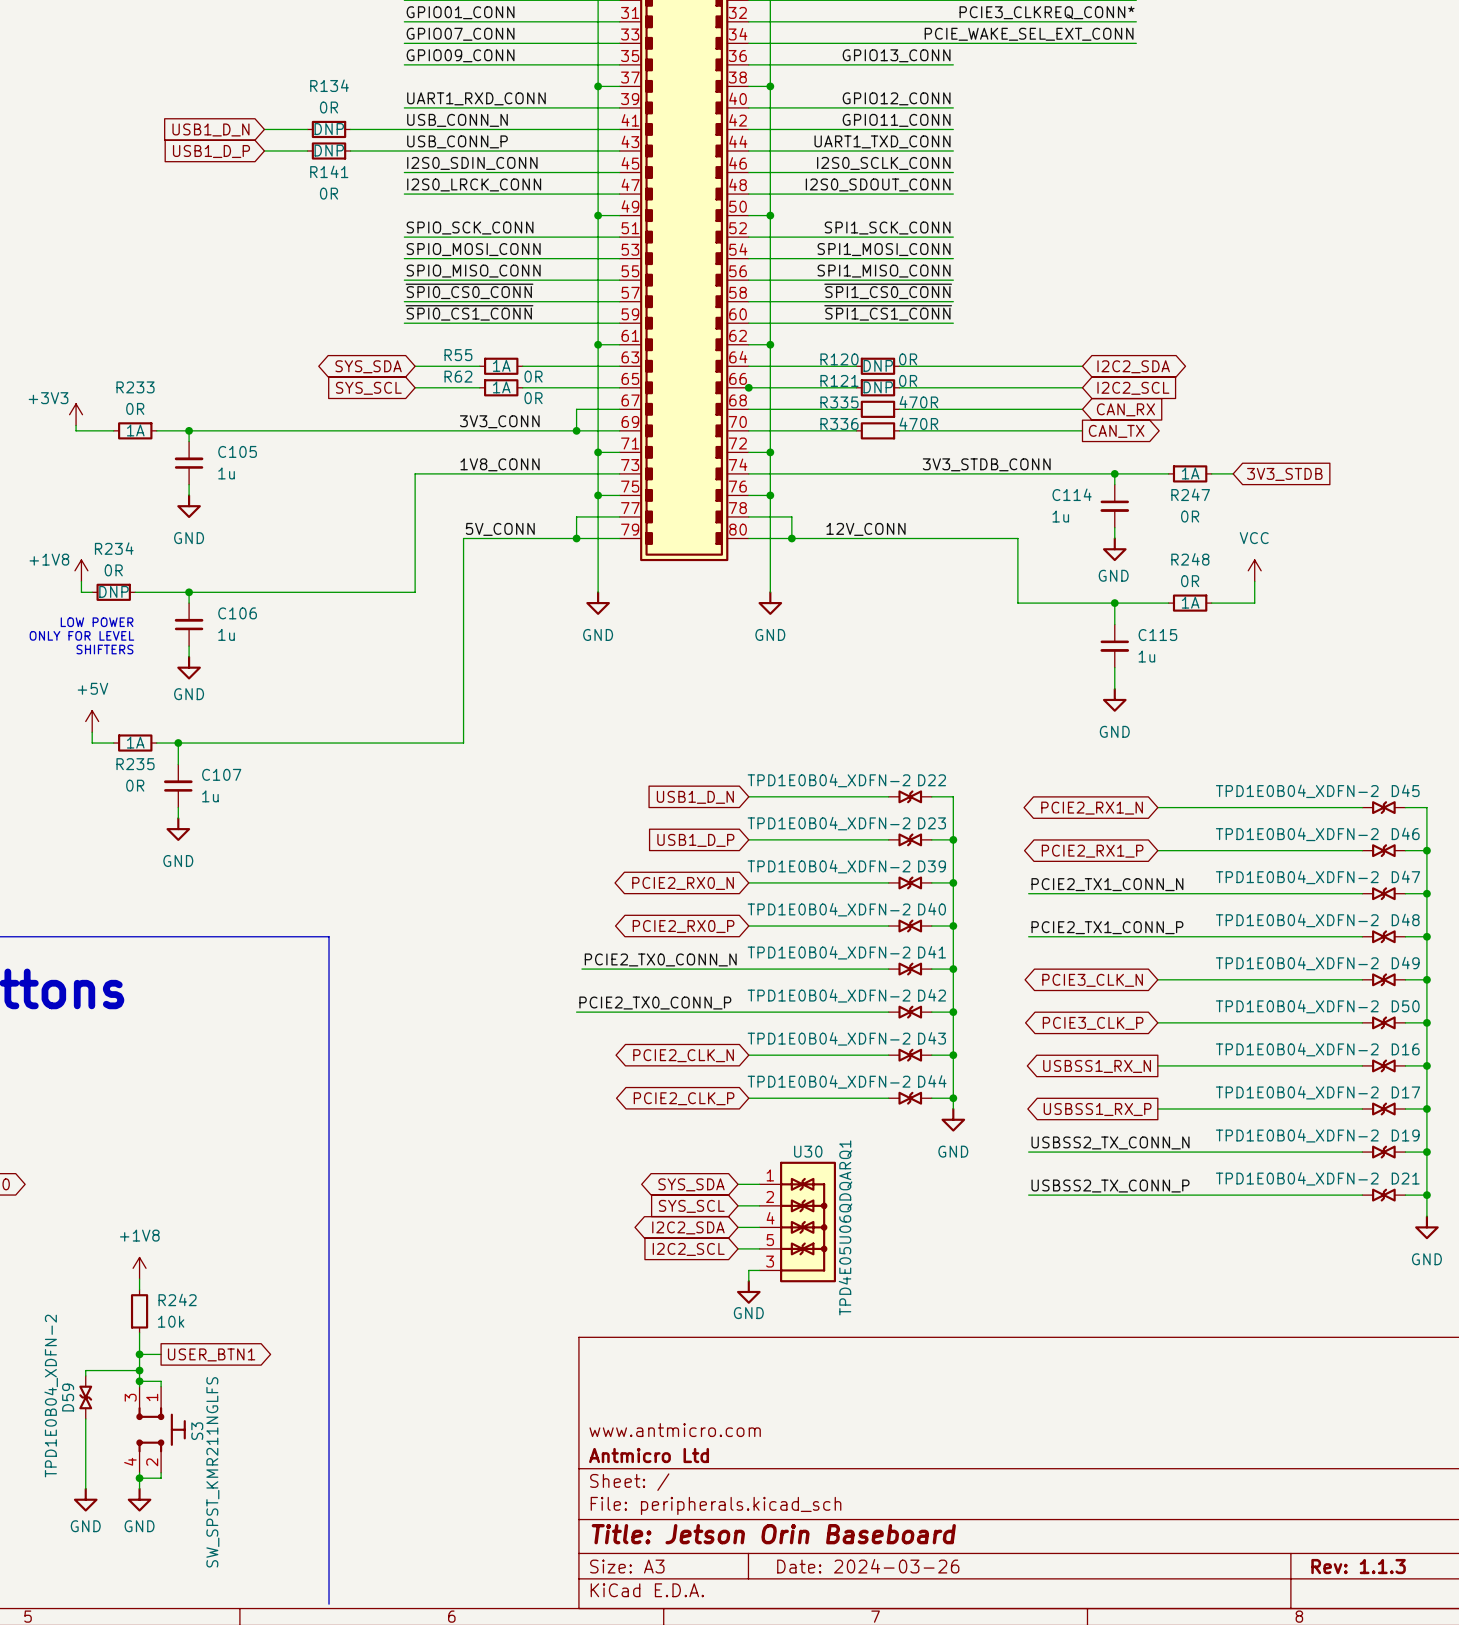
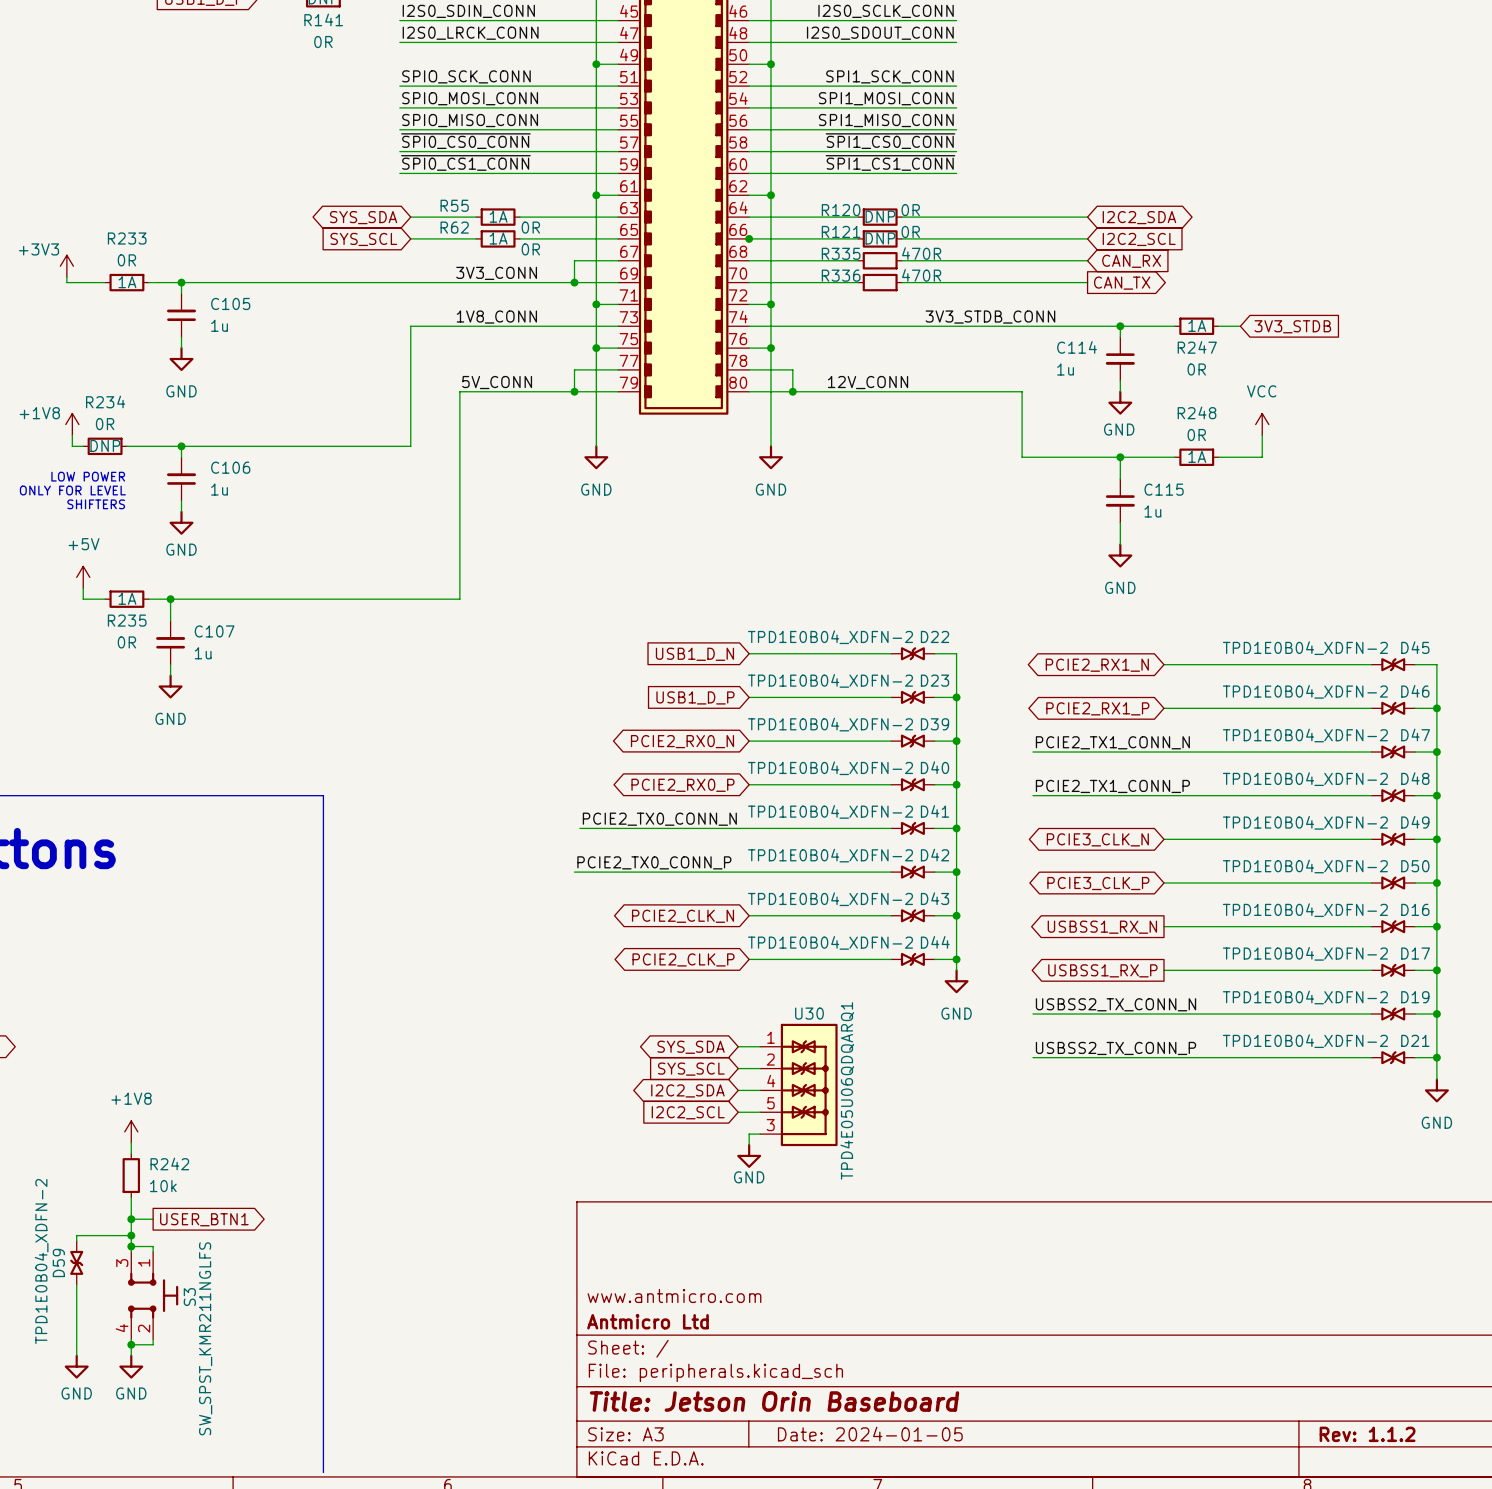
title block: Date: 2024-03-26 (868, 1566) -> Date: 2024-01-05 (870, 1434)
title block: Rev: 1.1.3 (1358, 1566) -> Rev: 1.1.2 (1367, 1434)

